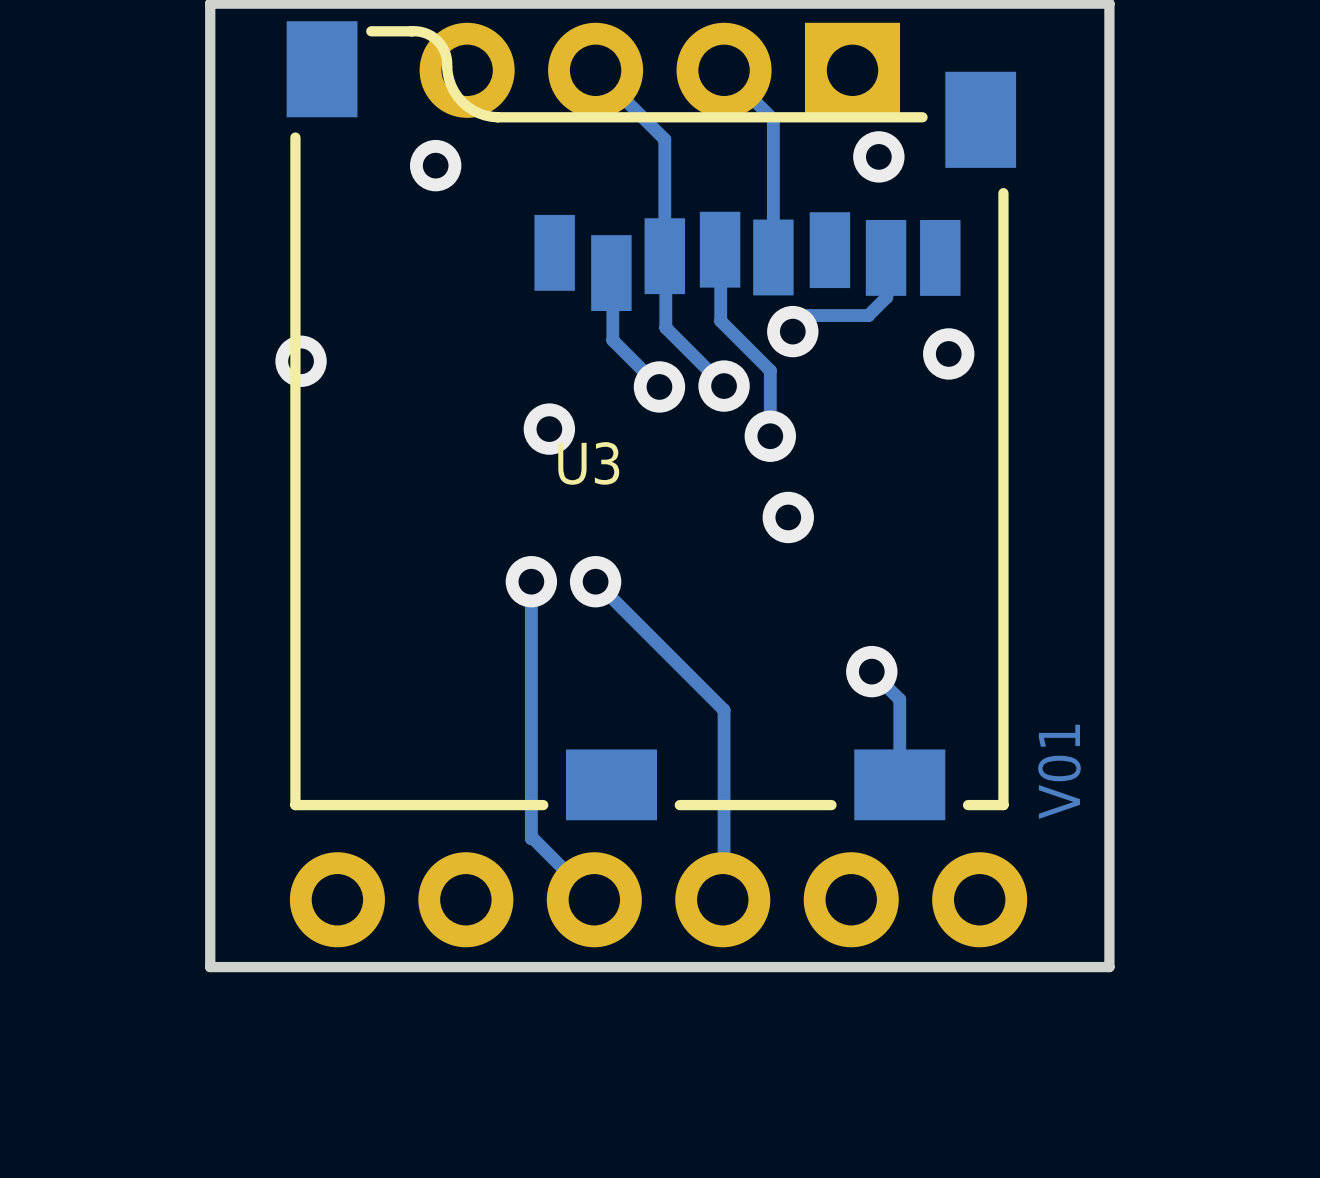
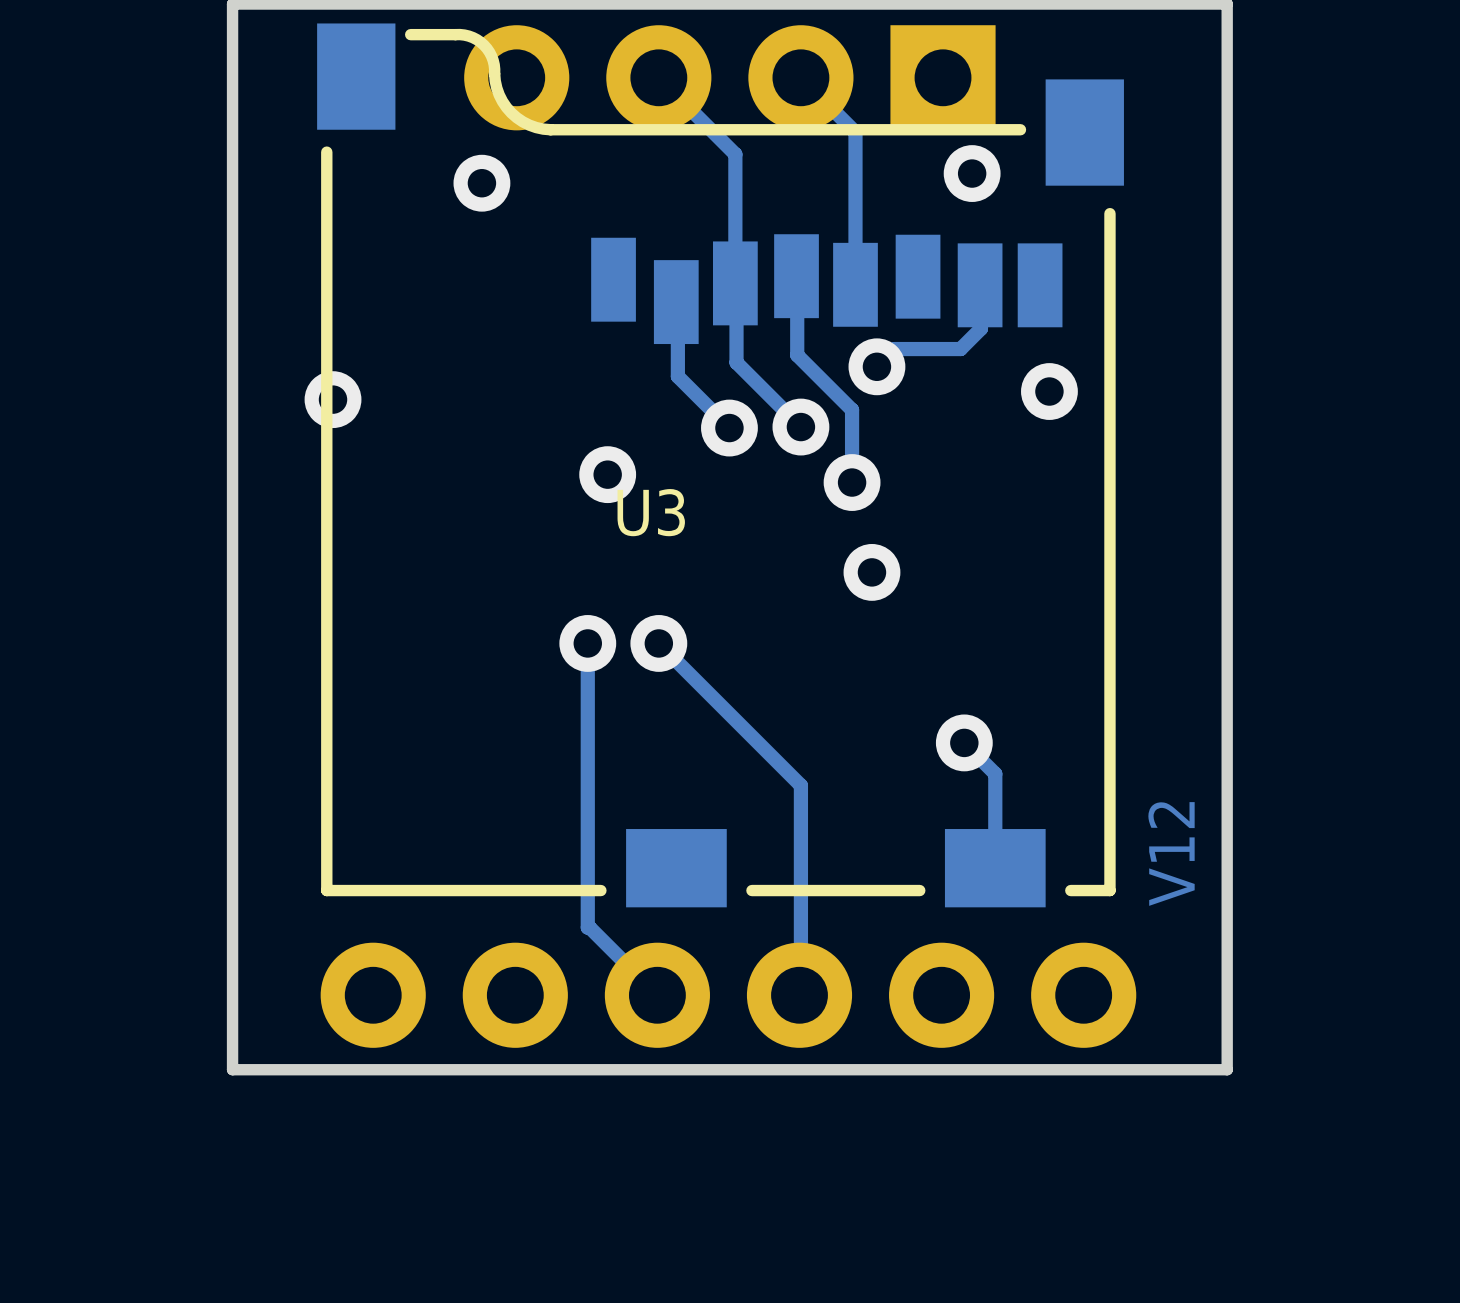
text: V01 (1059, 771) -> V12 (1171, 853)

